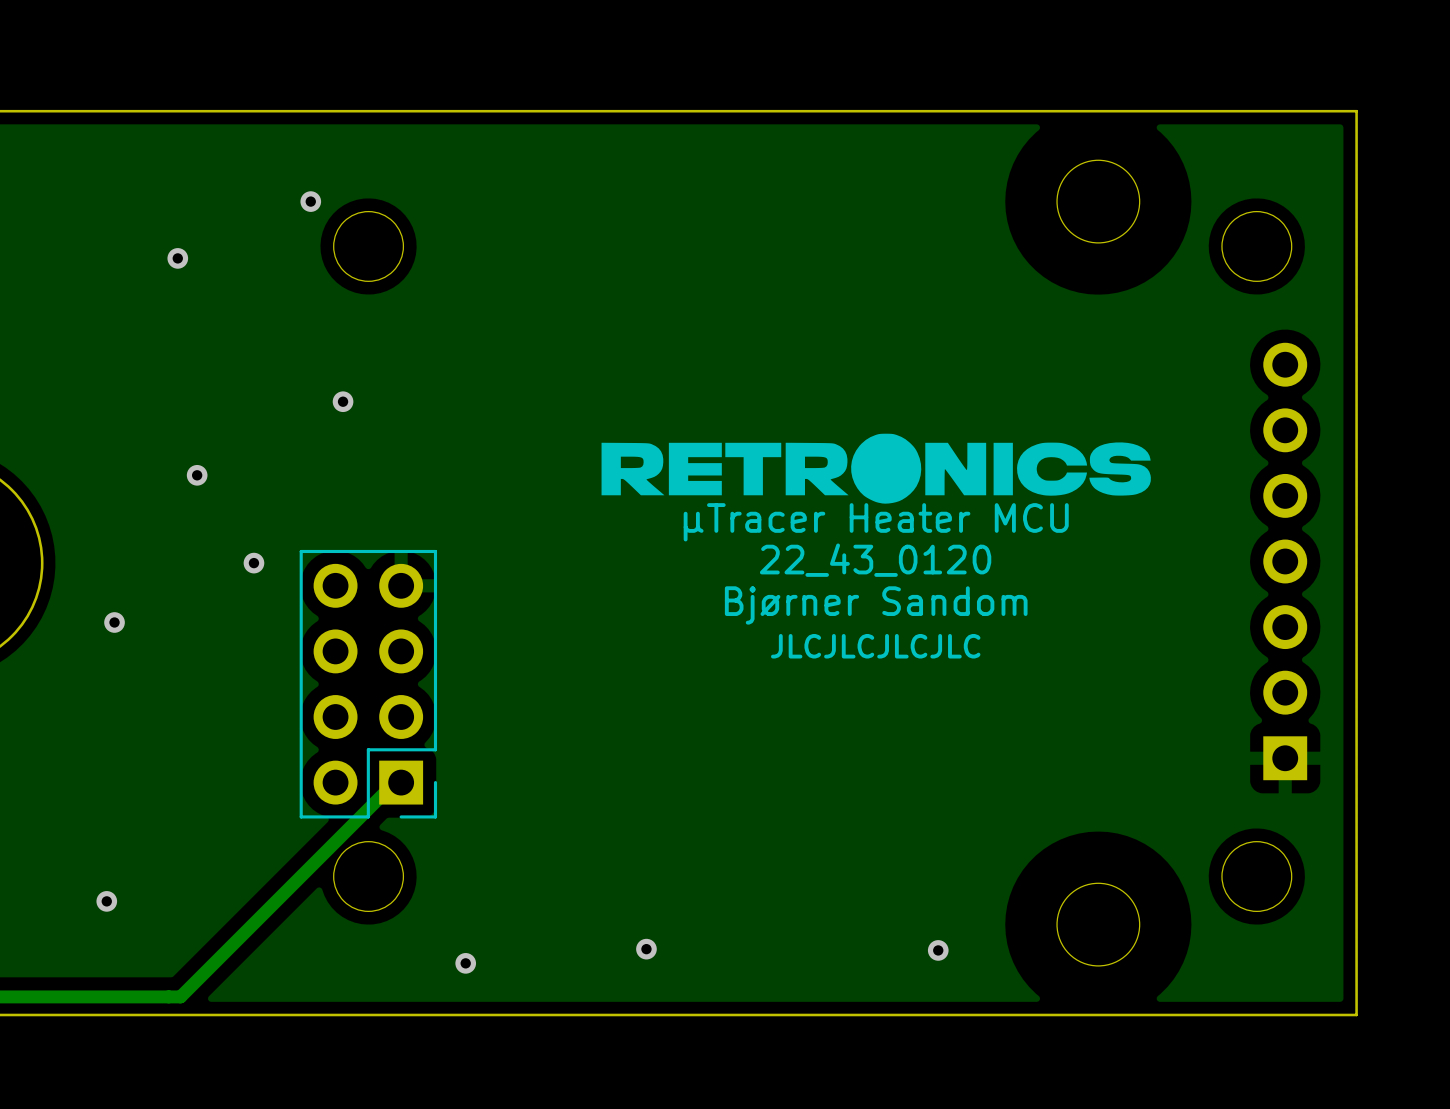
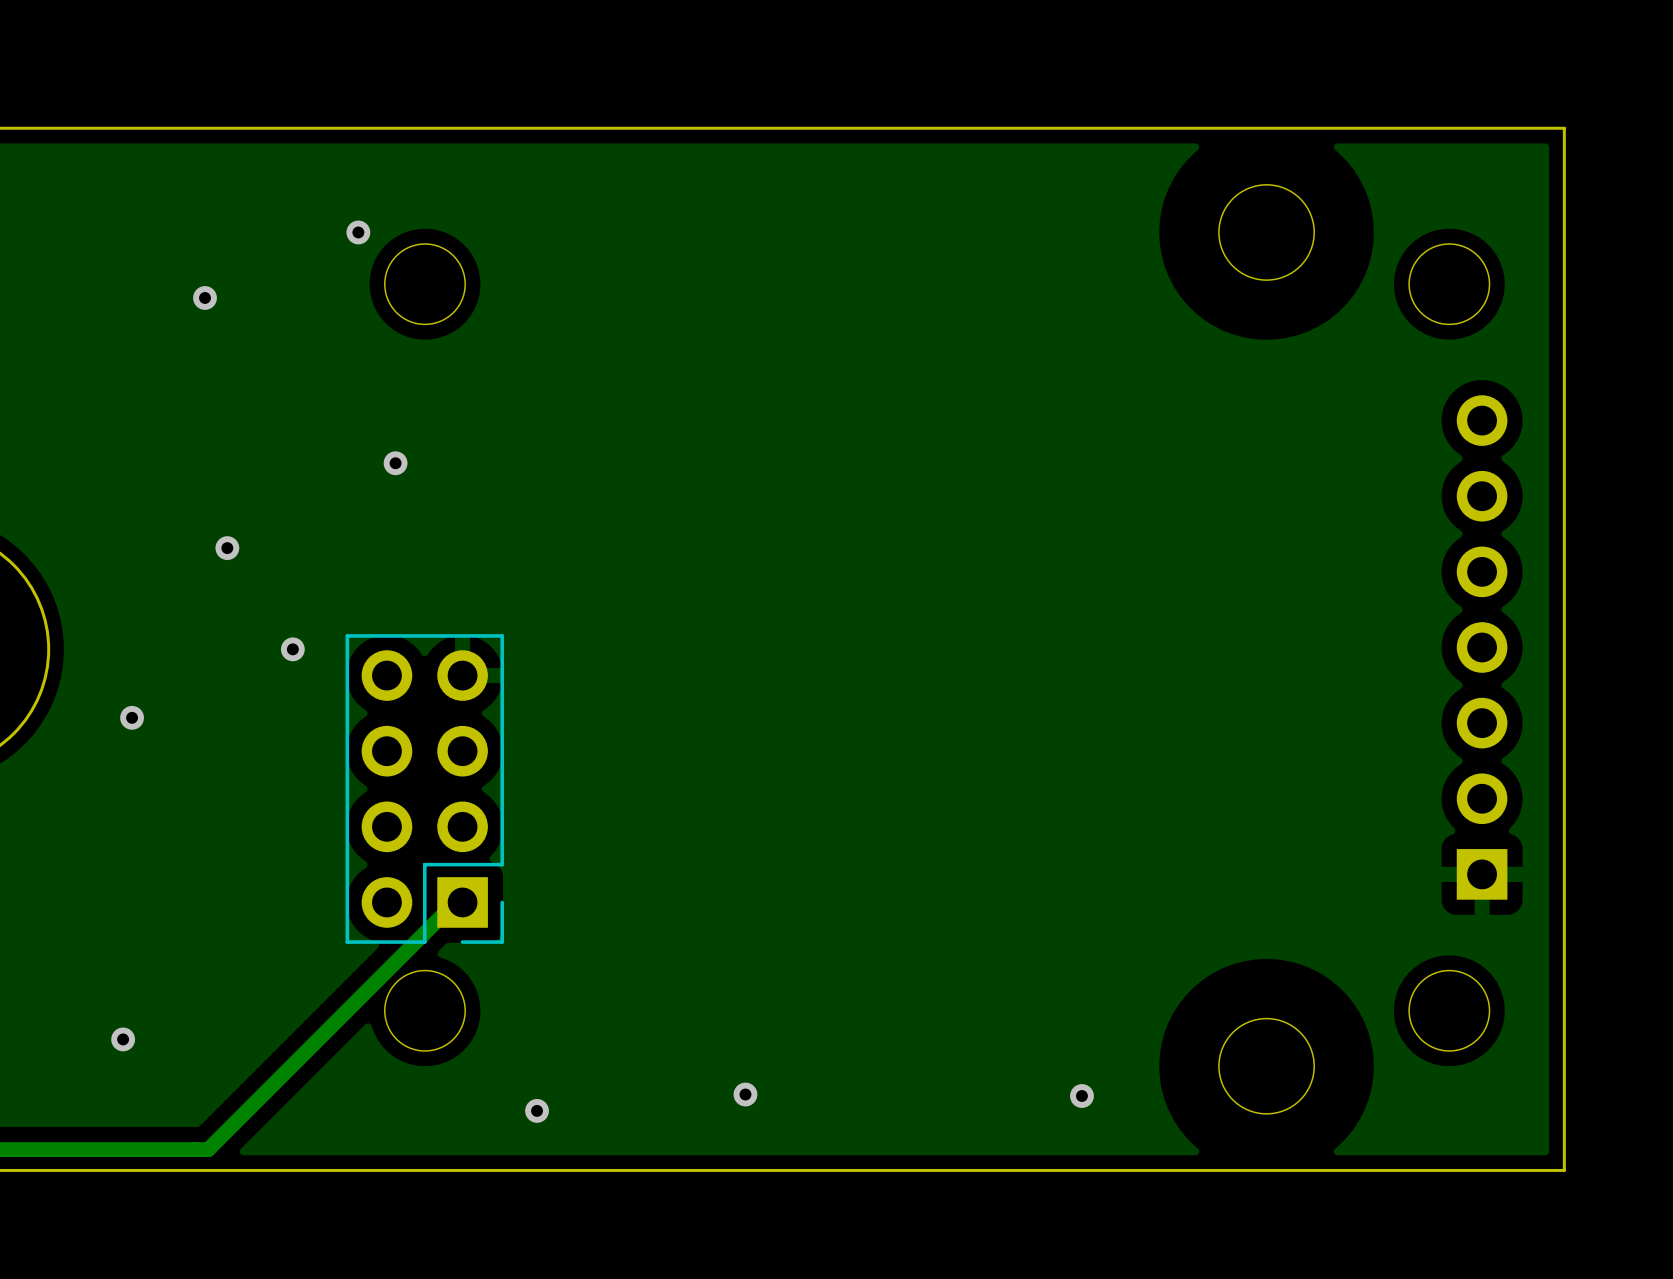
drawing: [601, 433, 1151, 504] -> none
text: µTracer Heater MCU (876, 522) -> none
text: 22_43_0120 (875, 560) -> none
text: Bjørner Sandom (876, 605) -> none
text: JLCJLCJLCJLC (875, 646) -> none

